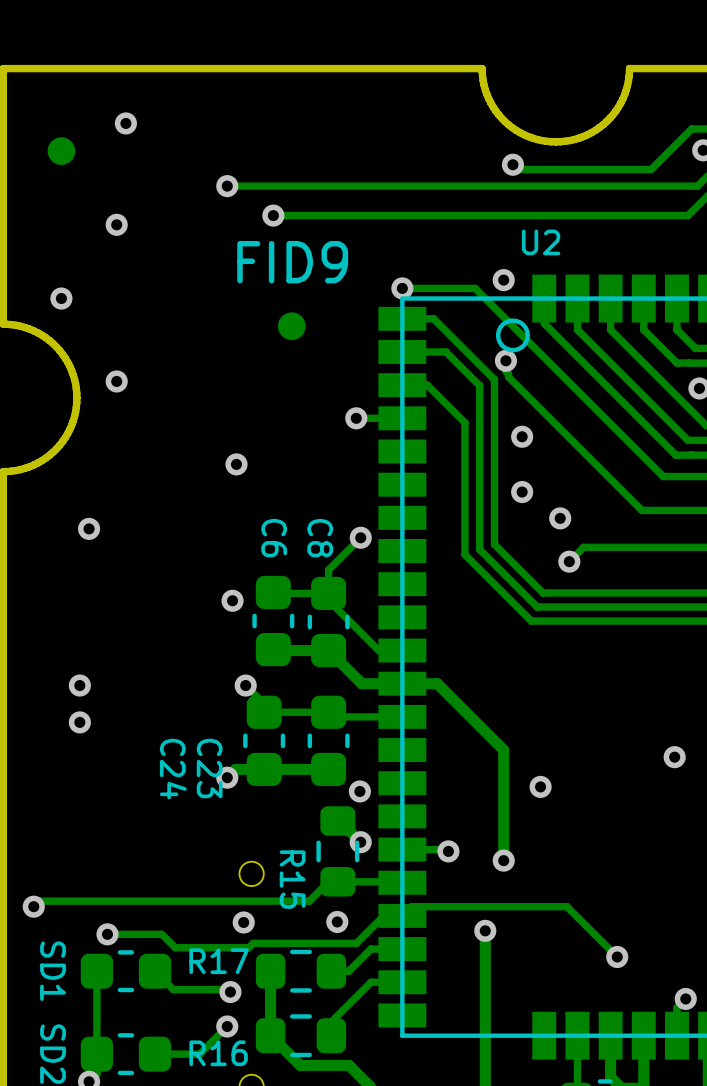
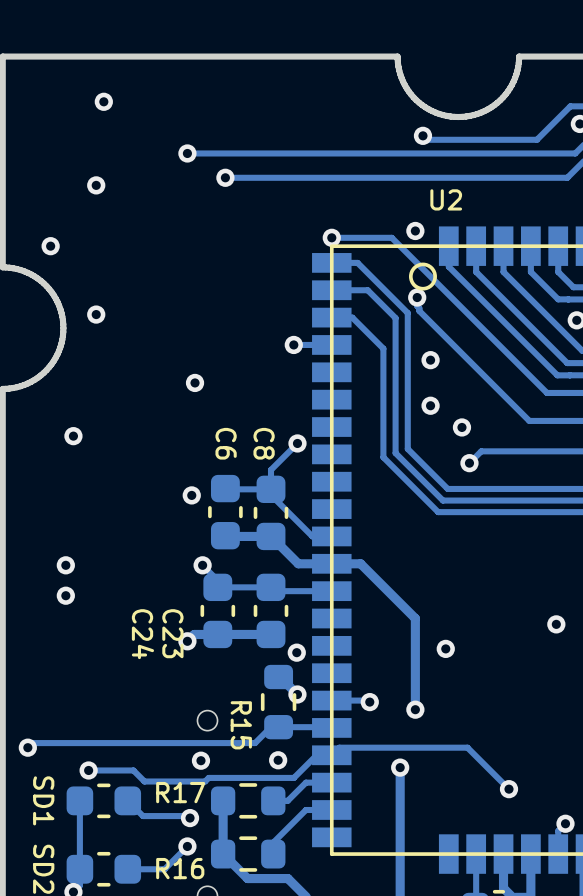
part: (61, 151) -> none
FID9: (291, 326) -> none

